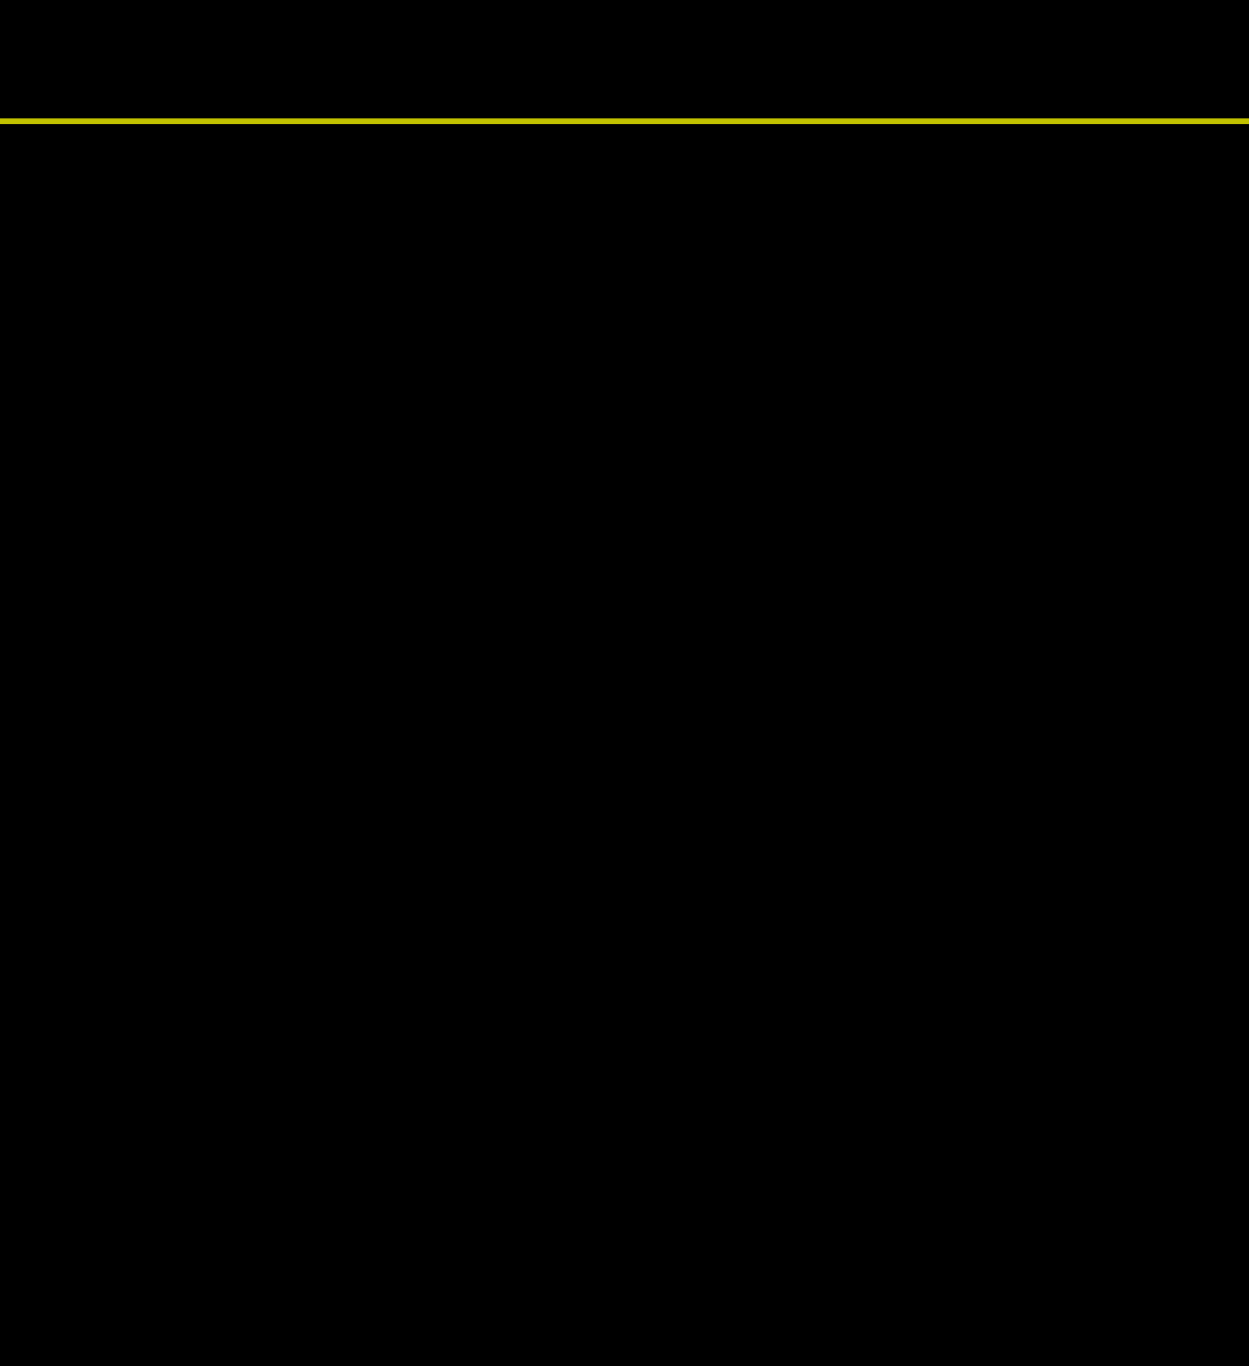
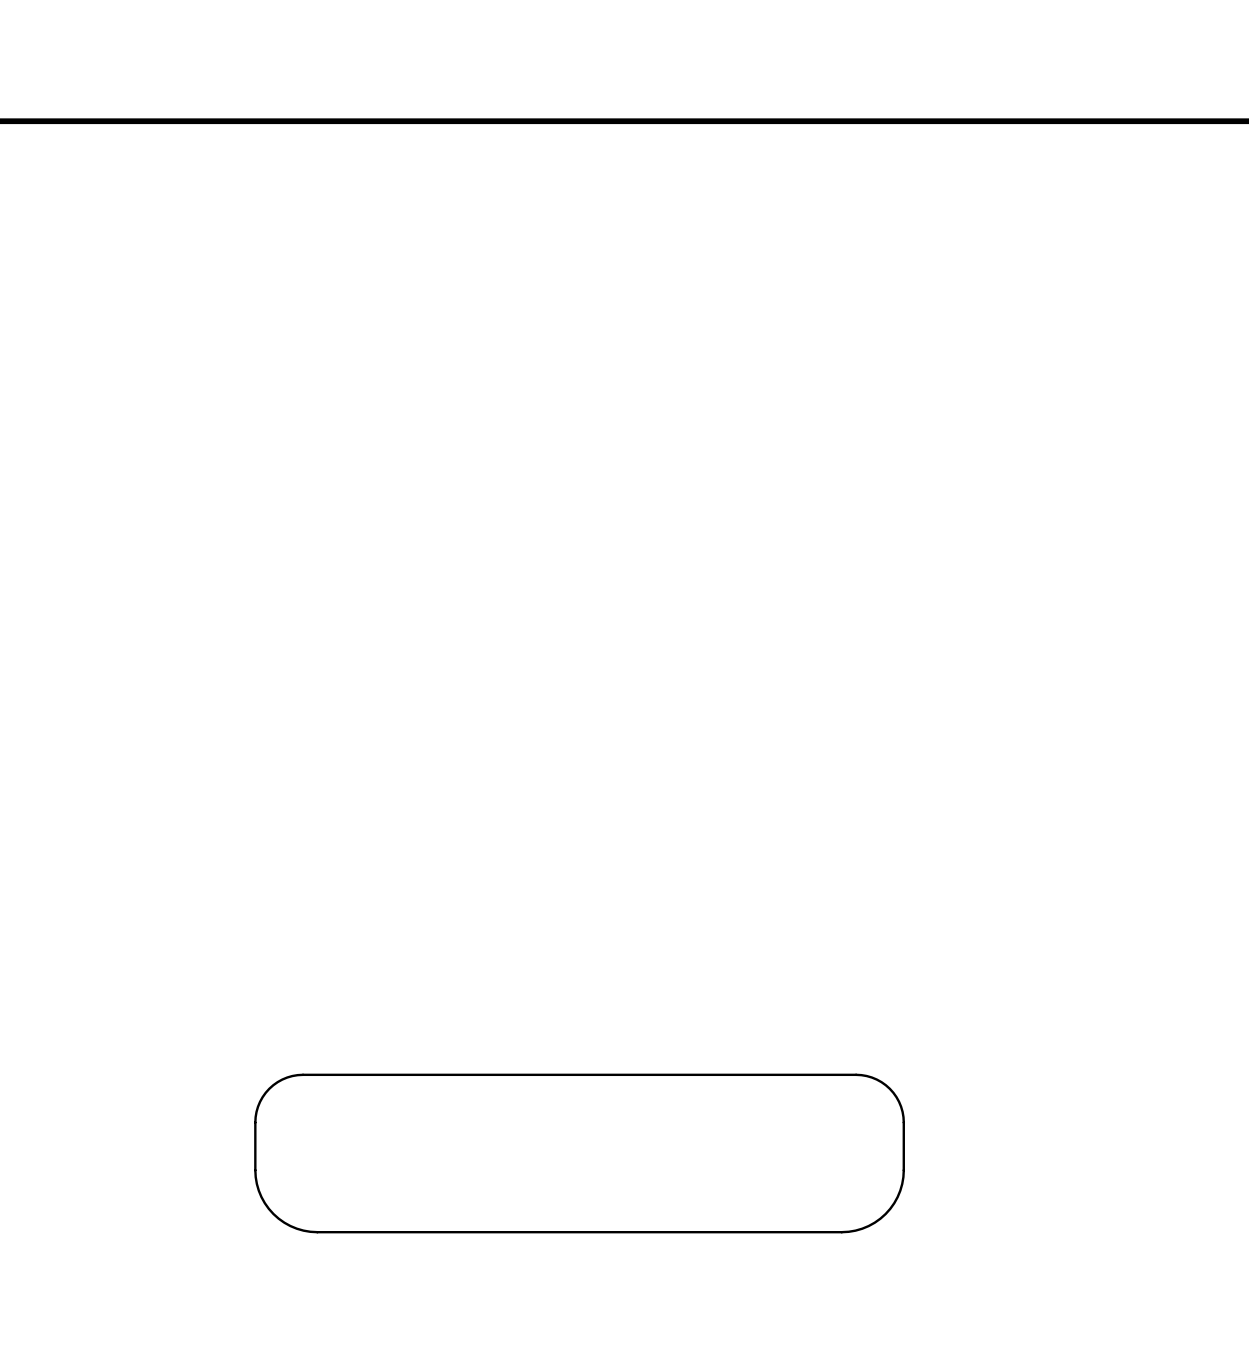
board edge: none -> (856, 1074) (292, 1076) (273, 1085) (262, 1097) (258, 1106) (255, 1122) (256, 1183) (264, 1203) (278, 1218) (296, 1228) (310, 1231) (841, 1232) (855, 1230) (874, 1222) (890, 1208) (900, 1190) (903, 1170) (903, 1117) (899, 1101) (889, 1088) (881, 1082) (871, 1077) (856, 1074)

